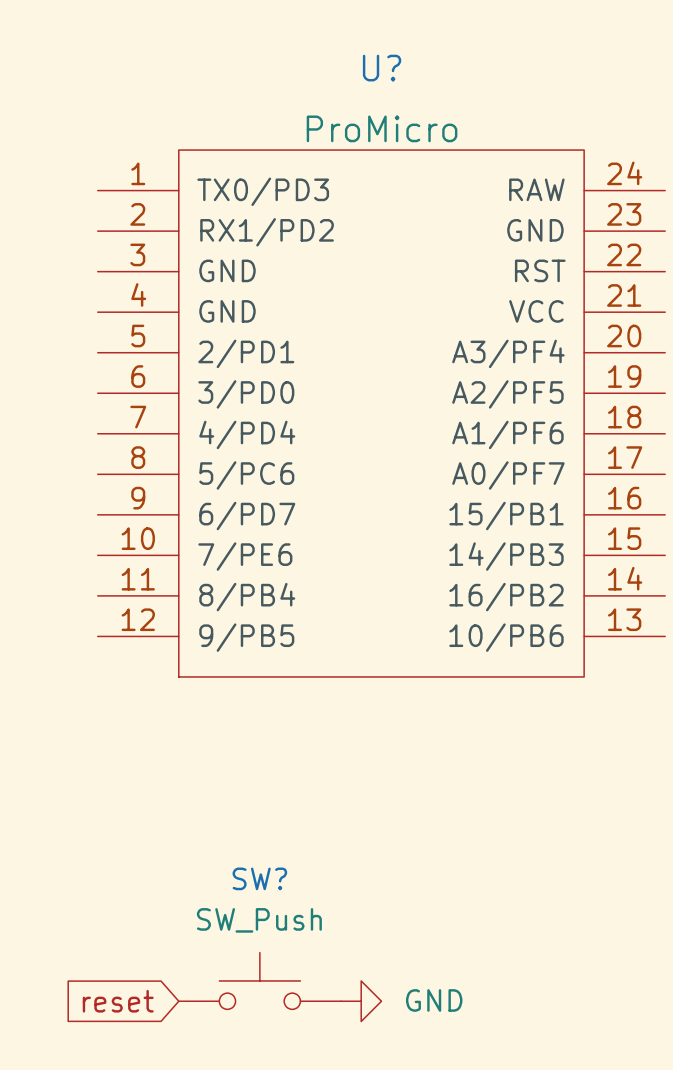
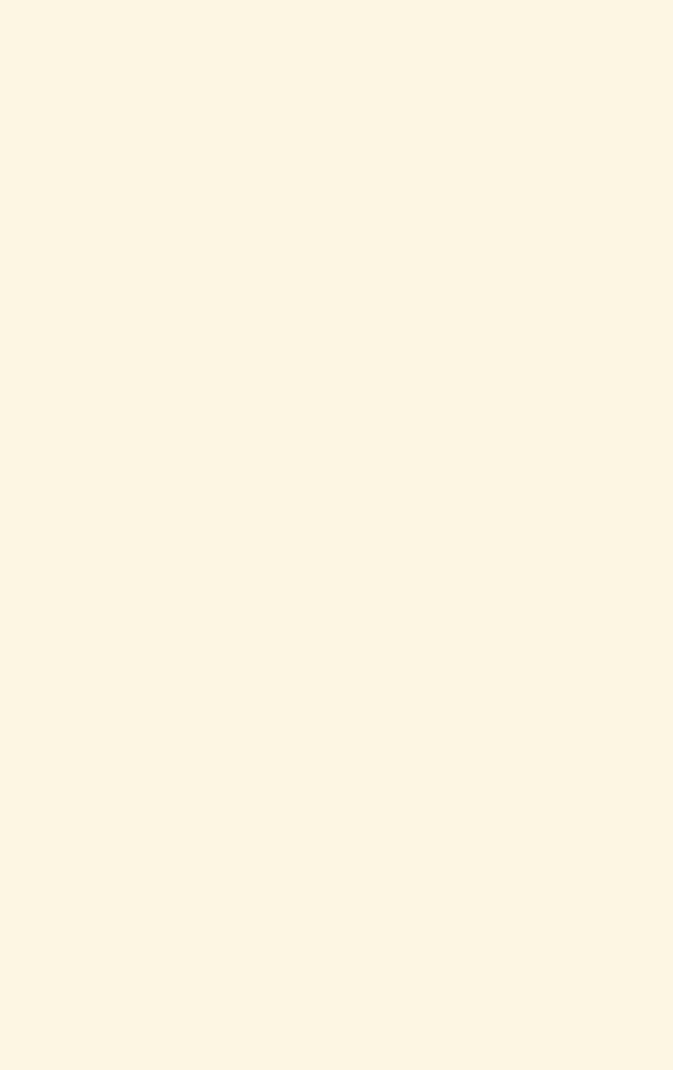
U?: ProMicro (381, 413) -> none
SW?: SW_Push (259, 980) -> none
global label: reset (118, 1001) -> none
power symbol: GND (361, 1001) -> none

